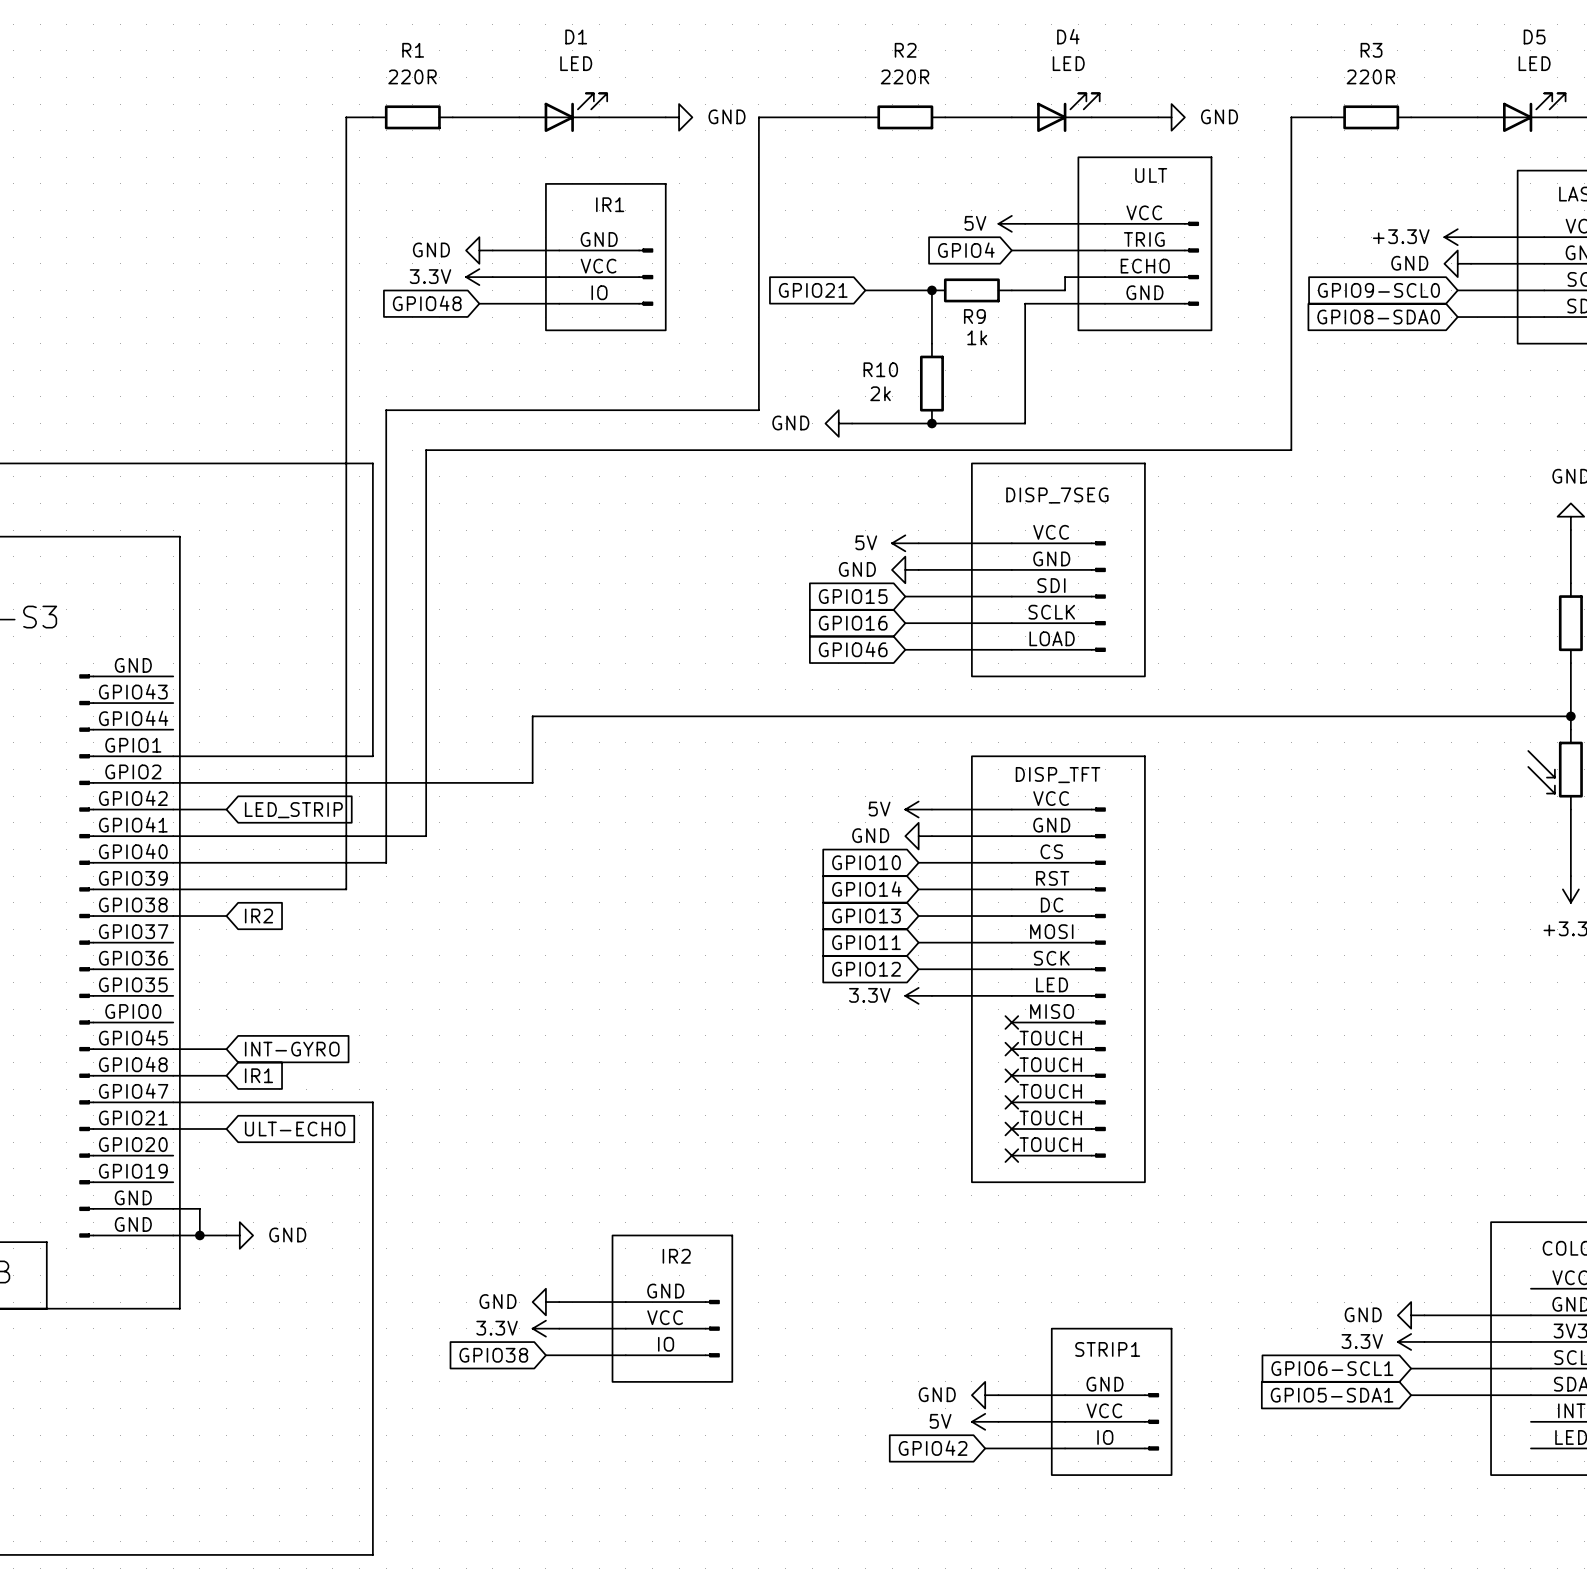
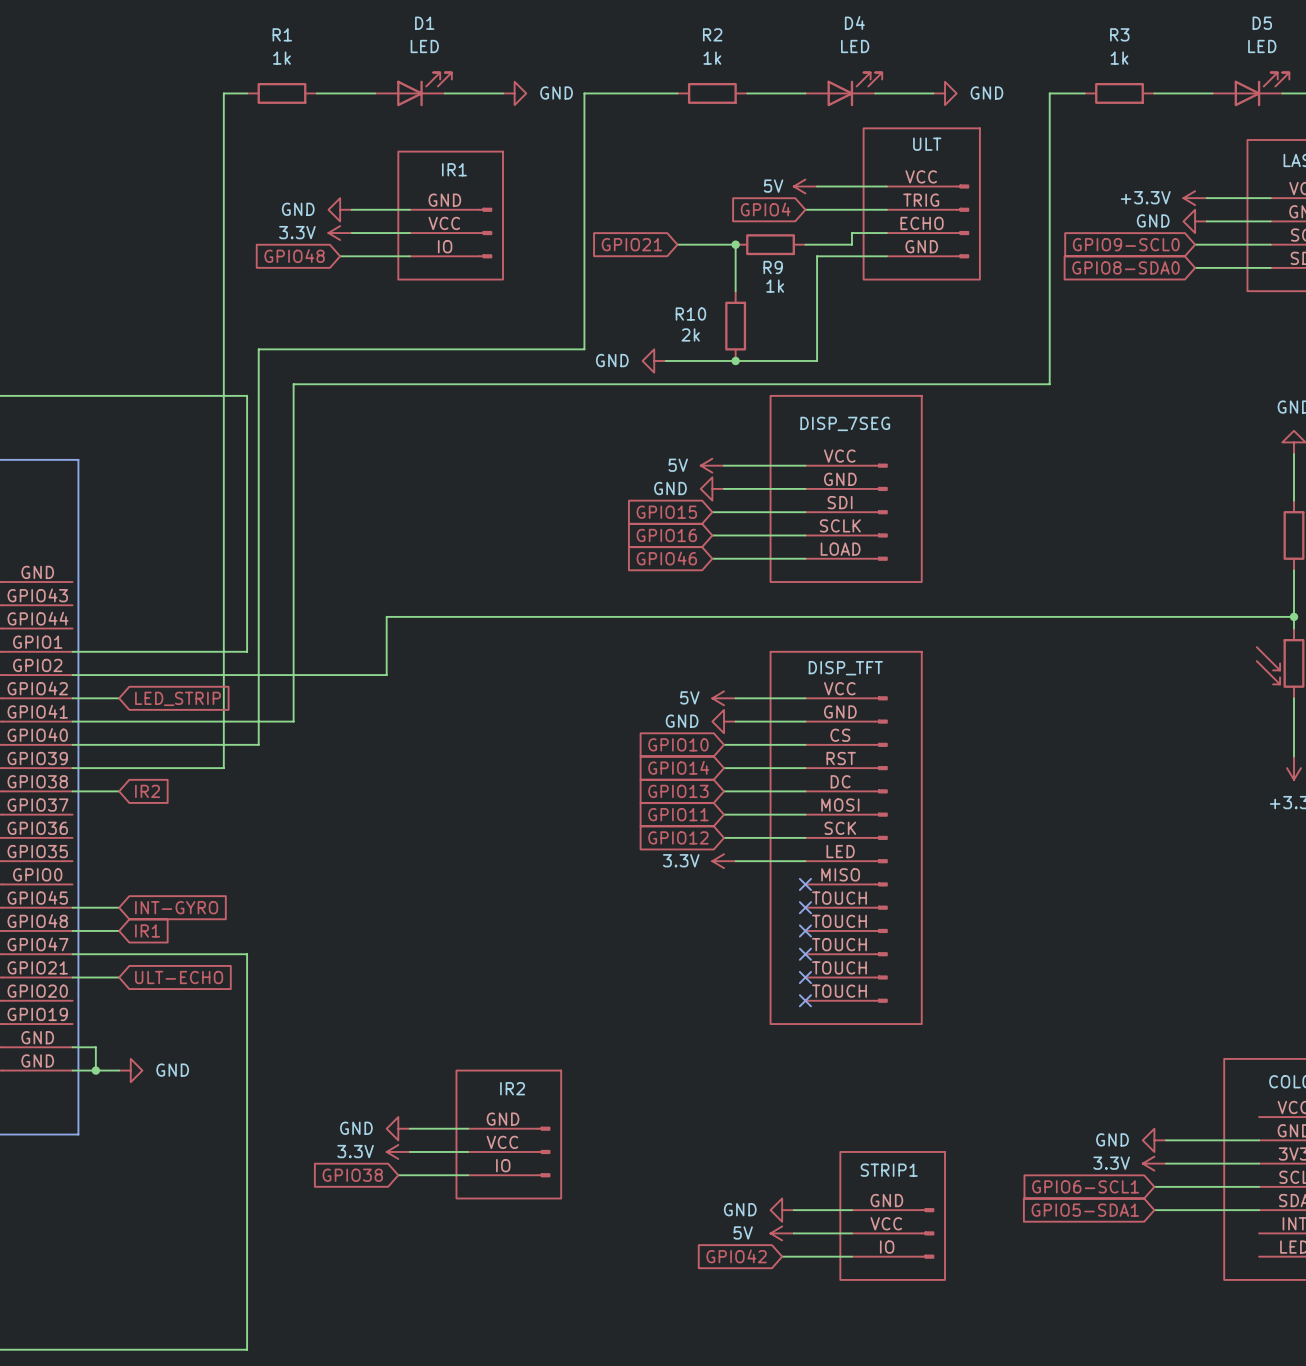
R1 value: 220R (412, 76) -> 1k (281, 58)
R2 value: 220R (905, 76) -> 1k (712, 58)
R3 value: 220R (1370, 76) -> 1k (1119, 58)

